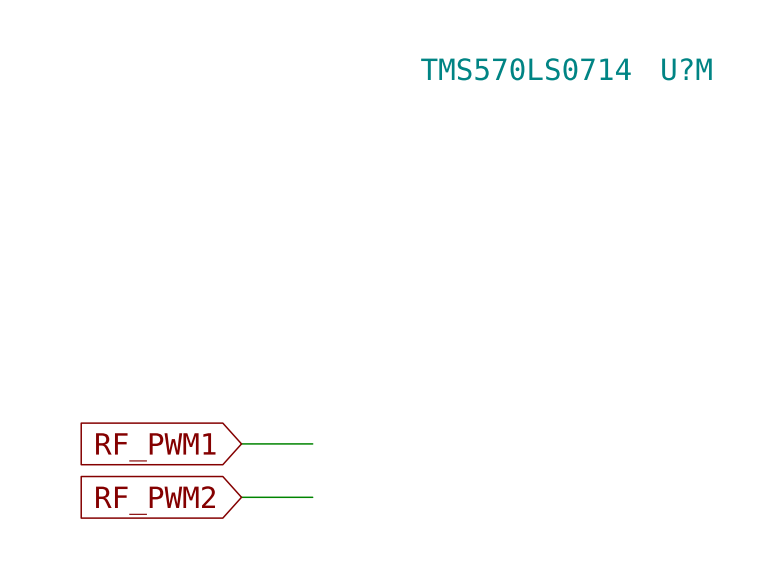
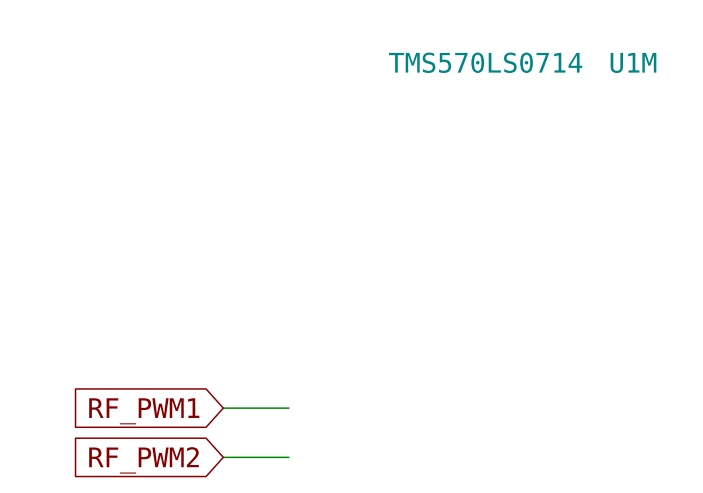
U?M name: U?M (686, 69) -> U1M (633, 62)

